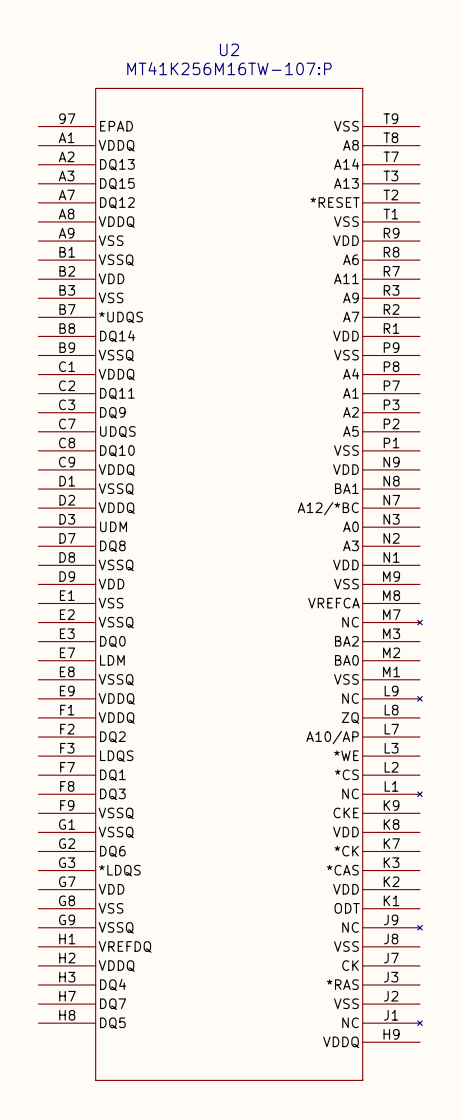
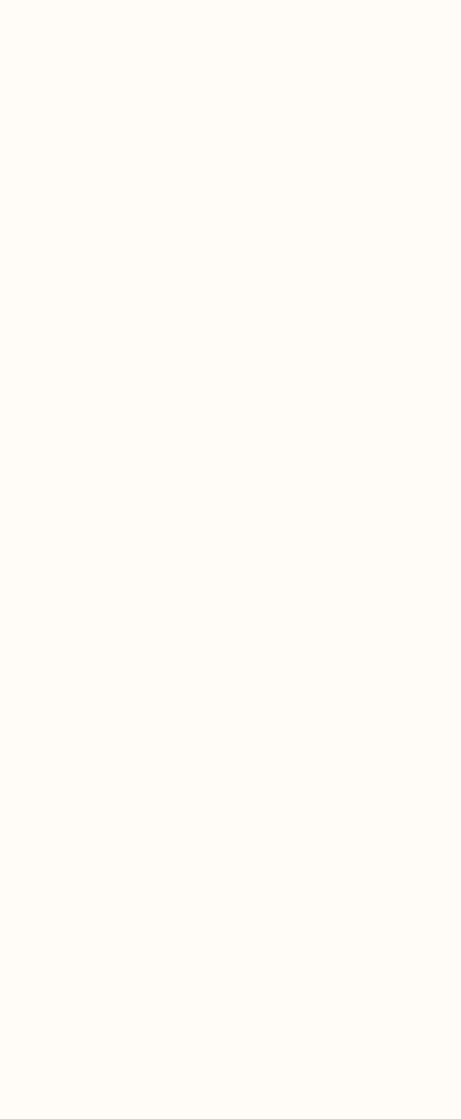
U2: MT41K256M16TW-107:P (230, 584) -> none

